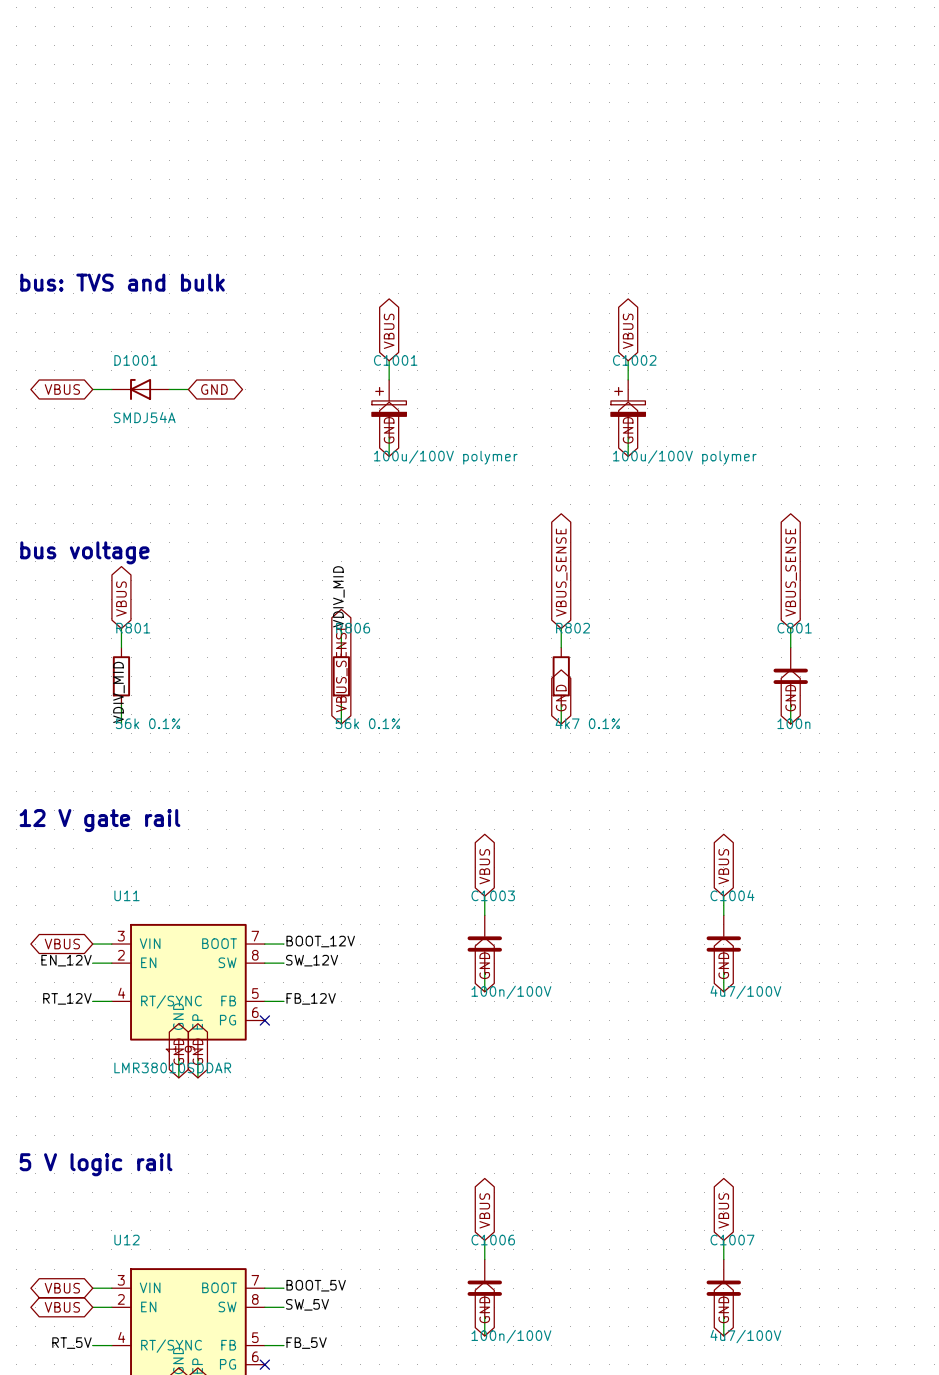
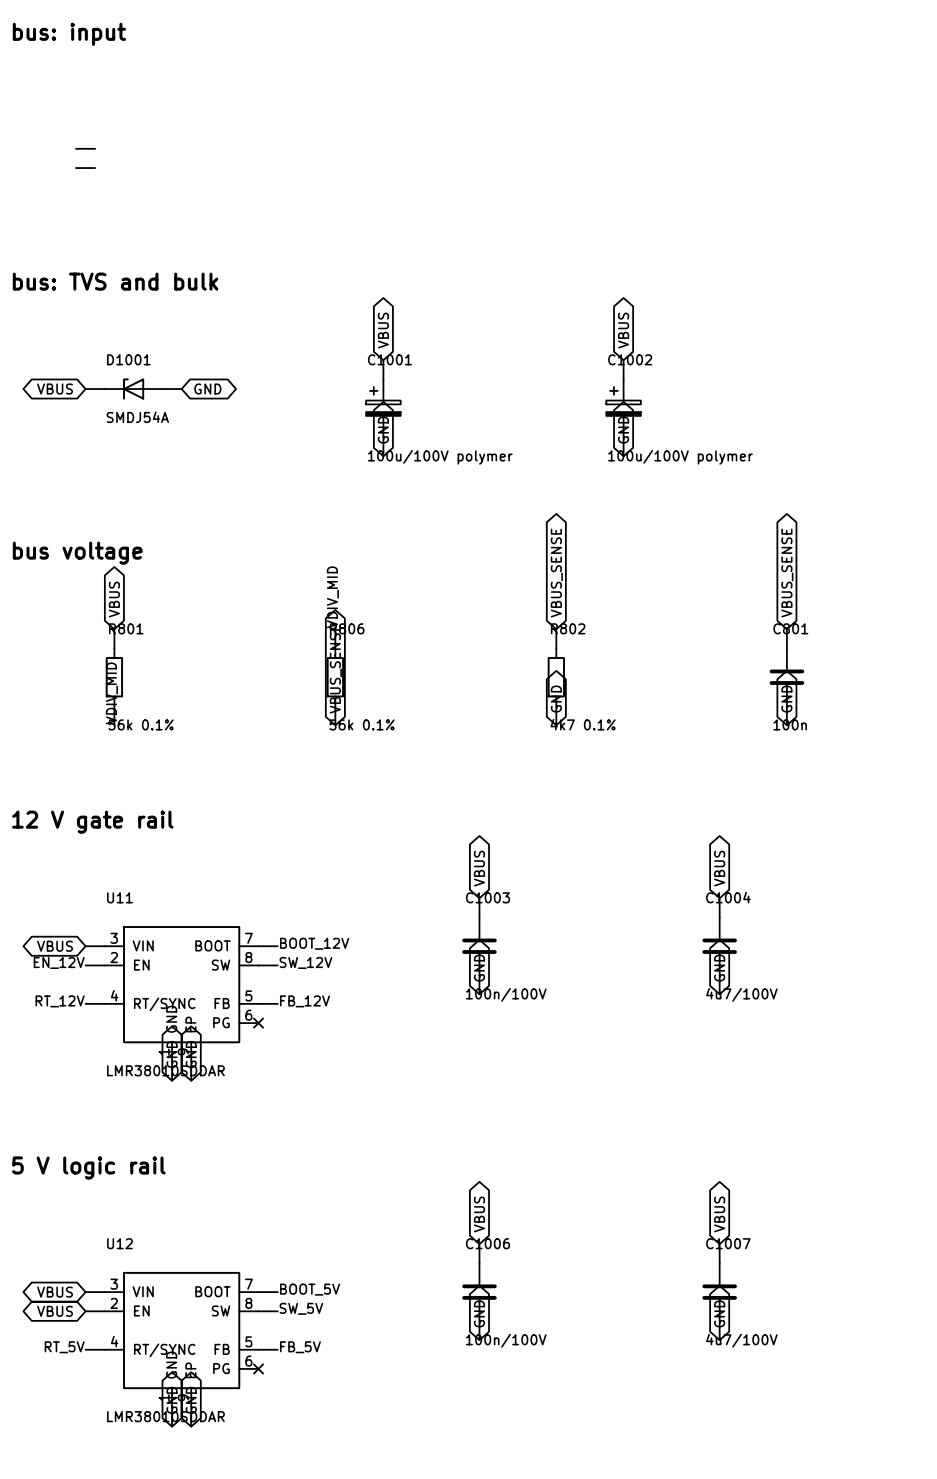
text: none -> bus: input (69, 34)
wire: none -> (75, 148) (95, 148)
wire: none -> (75, 168) (95, 168)

